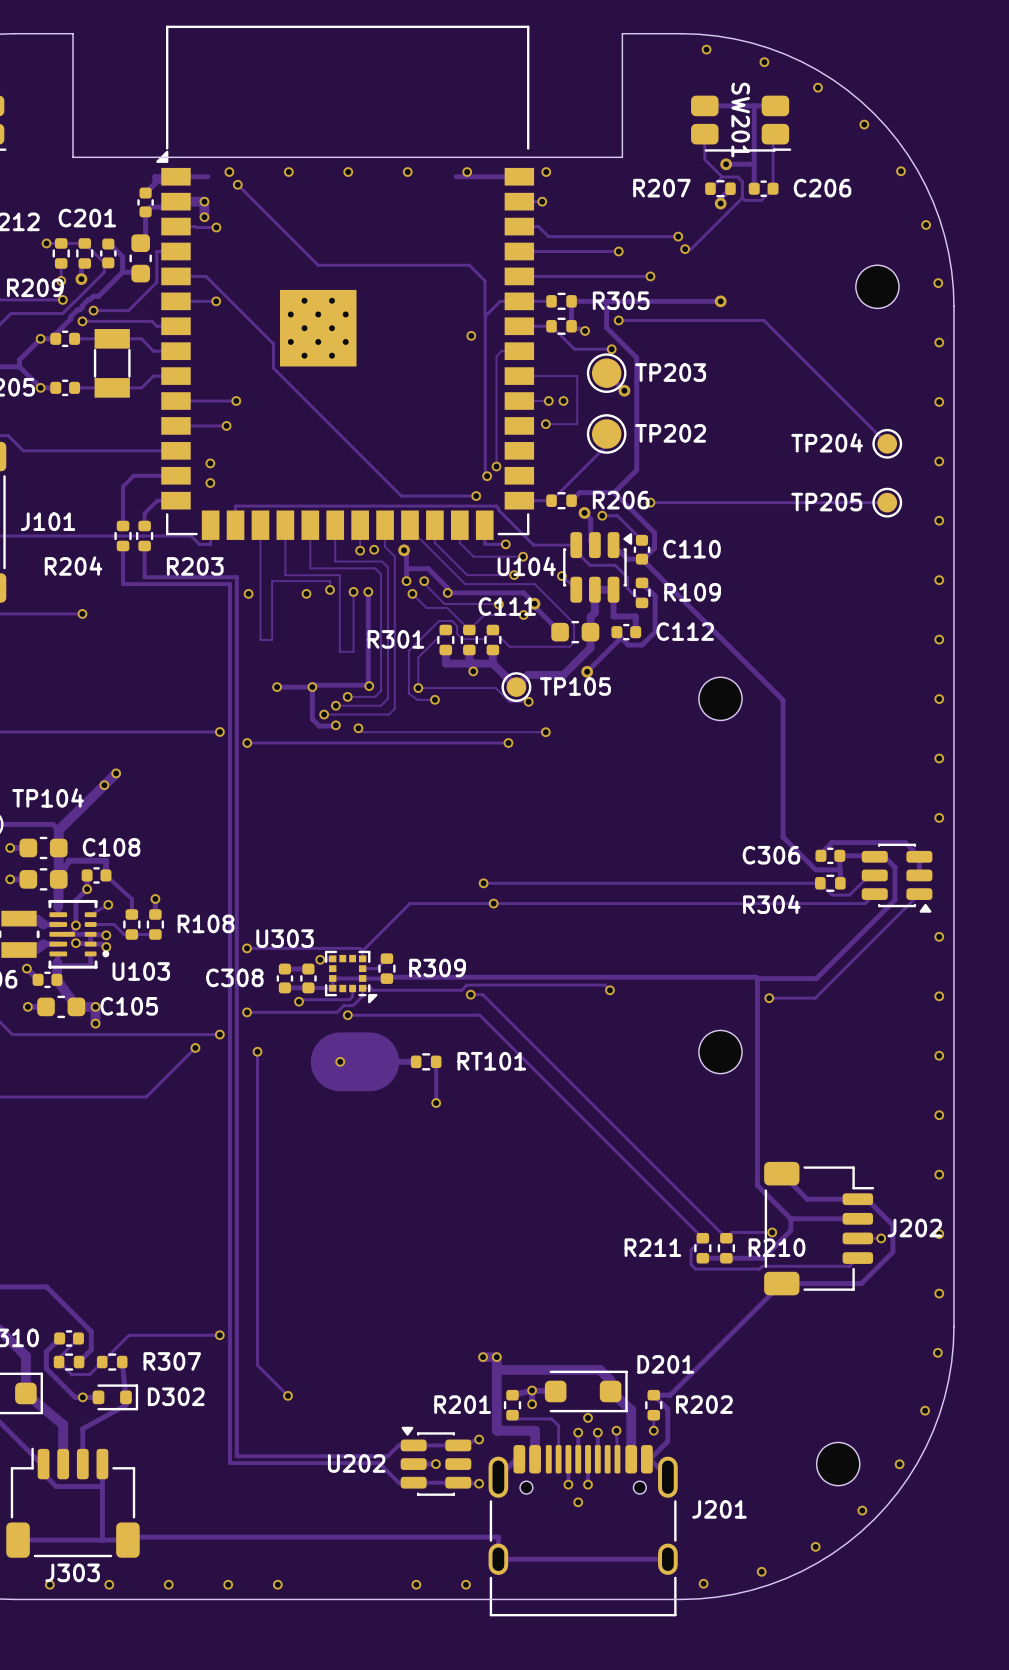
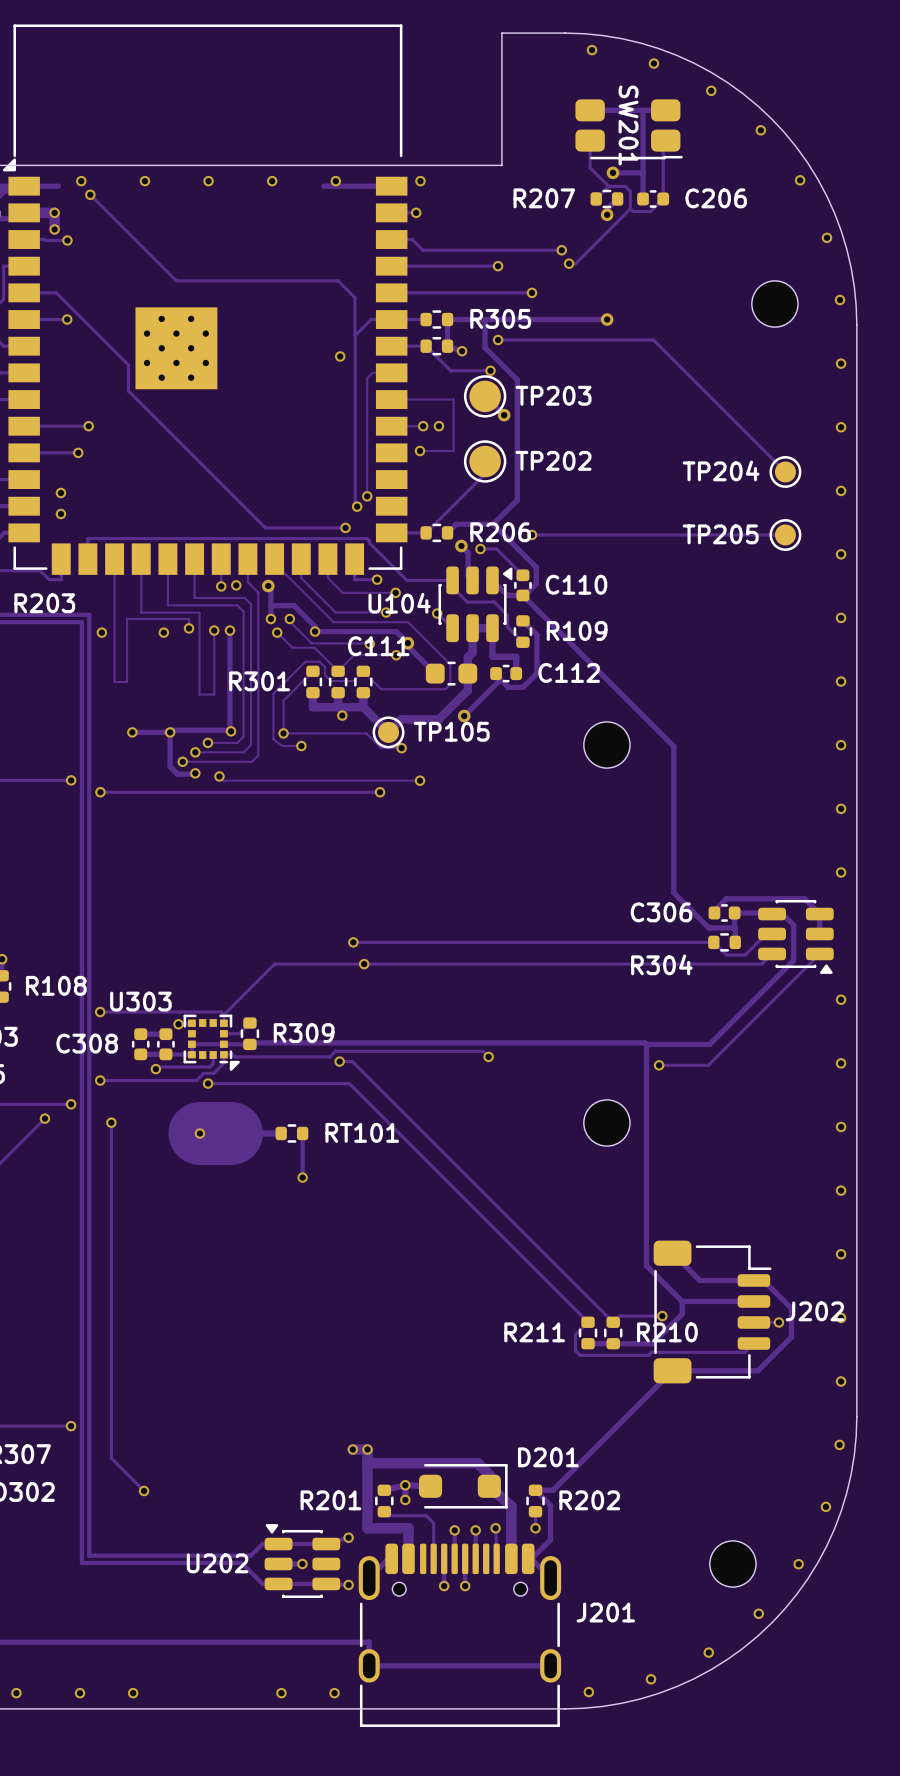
via: (588, 1417) -> none
via: (578, 1502) -> none

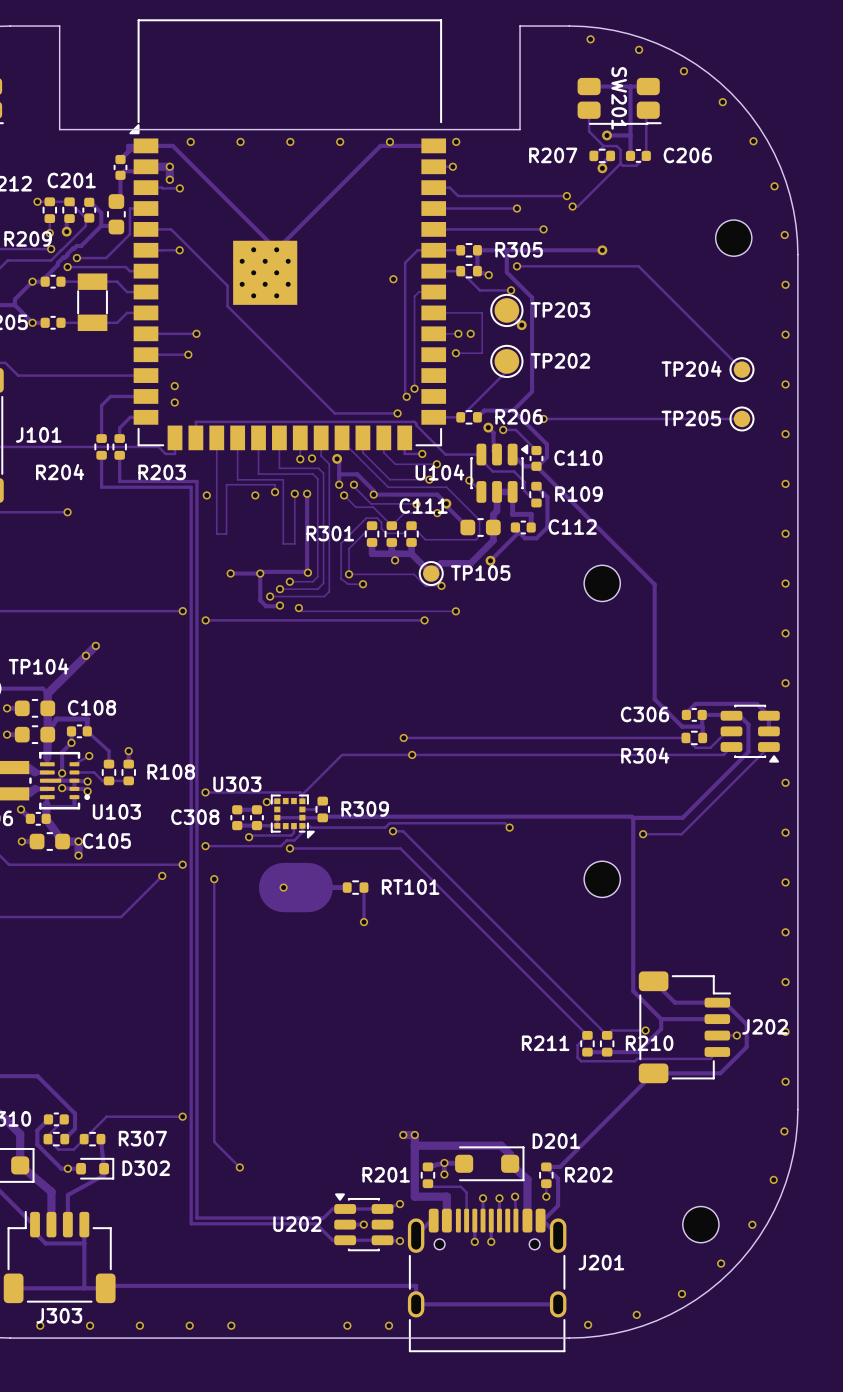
track: none -> (172, 145) (276, 249)
track: none -> (380, 145) (276, 249)
track: (90, 194) (176, 280) (338, 280) (354, 297) (354, 335) -> none
via: (90, 194) -> none

